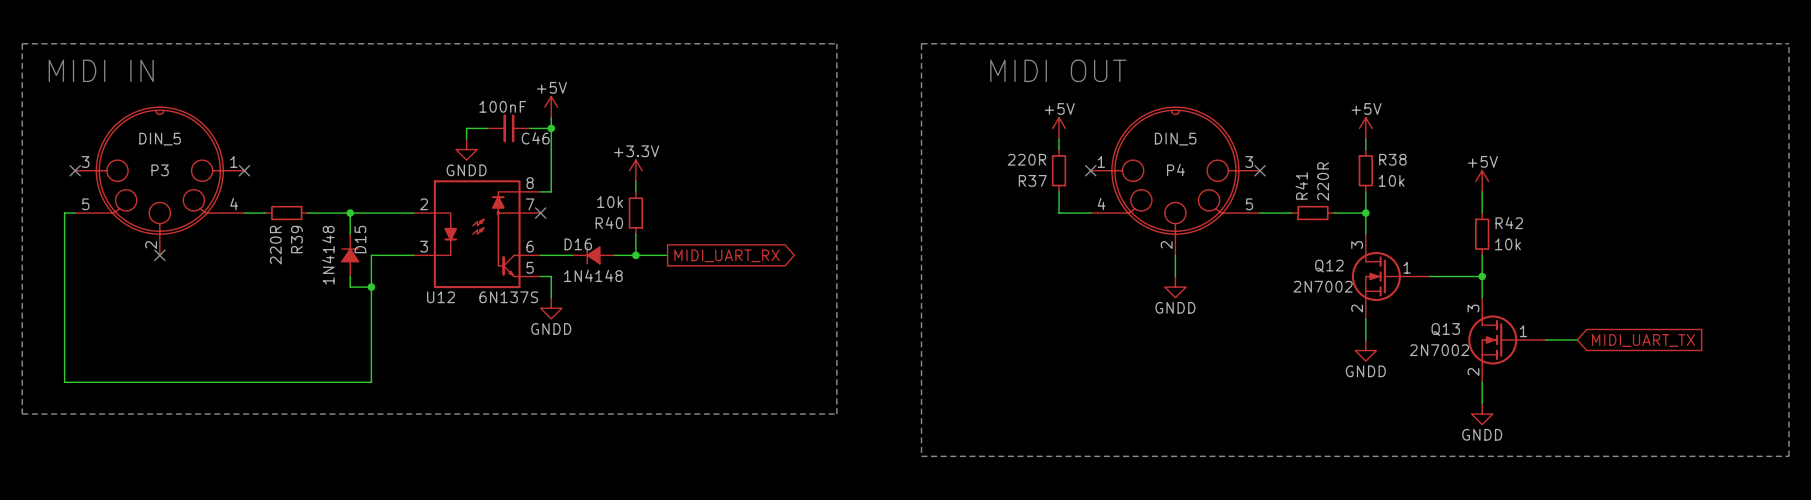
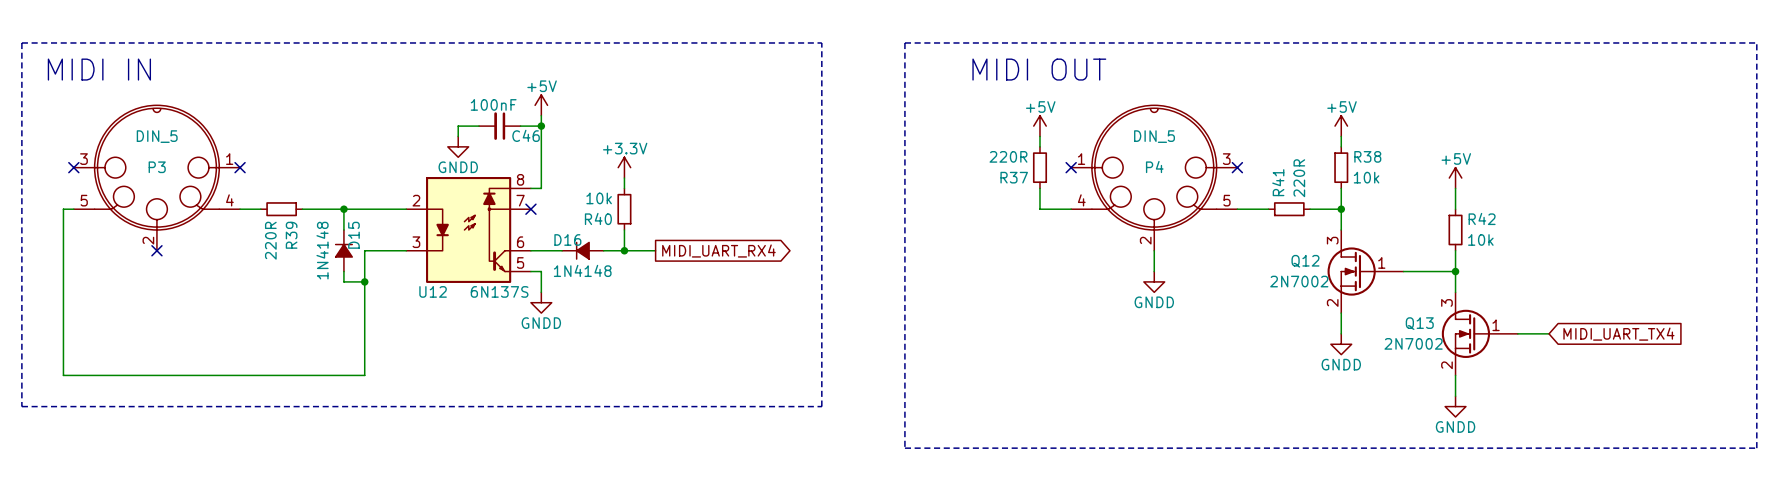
global label: MIDI_UART_RX (727, 255) -> MIDI_UART_RX4 (718, 251)
global label: MIDI_UART_TX (1643, 340) -> MIDI_UART_TX4 (1618, 334)

